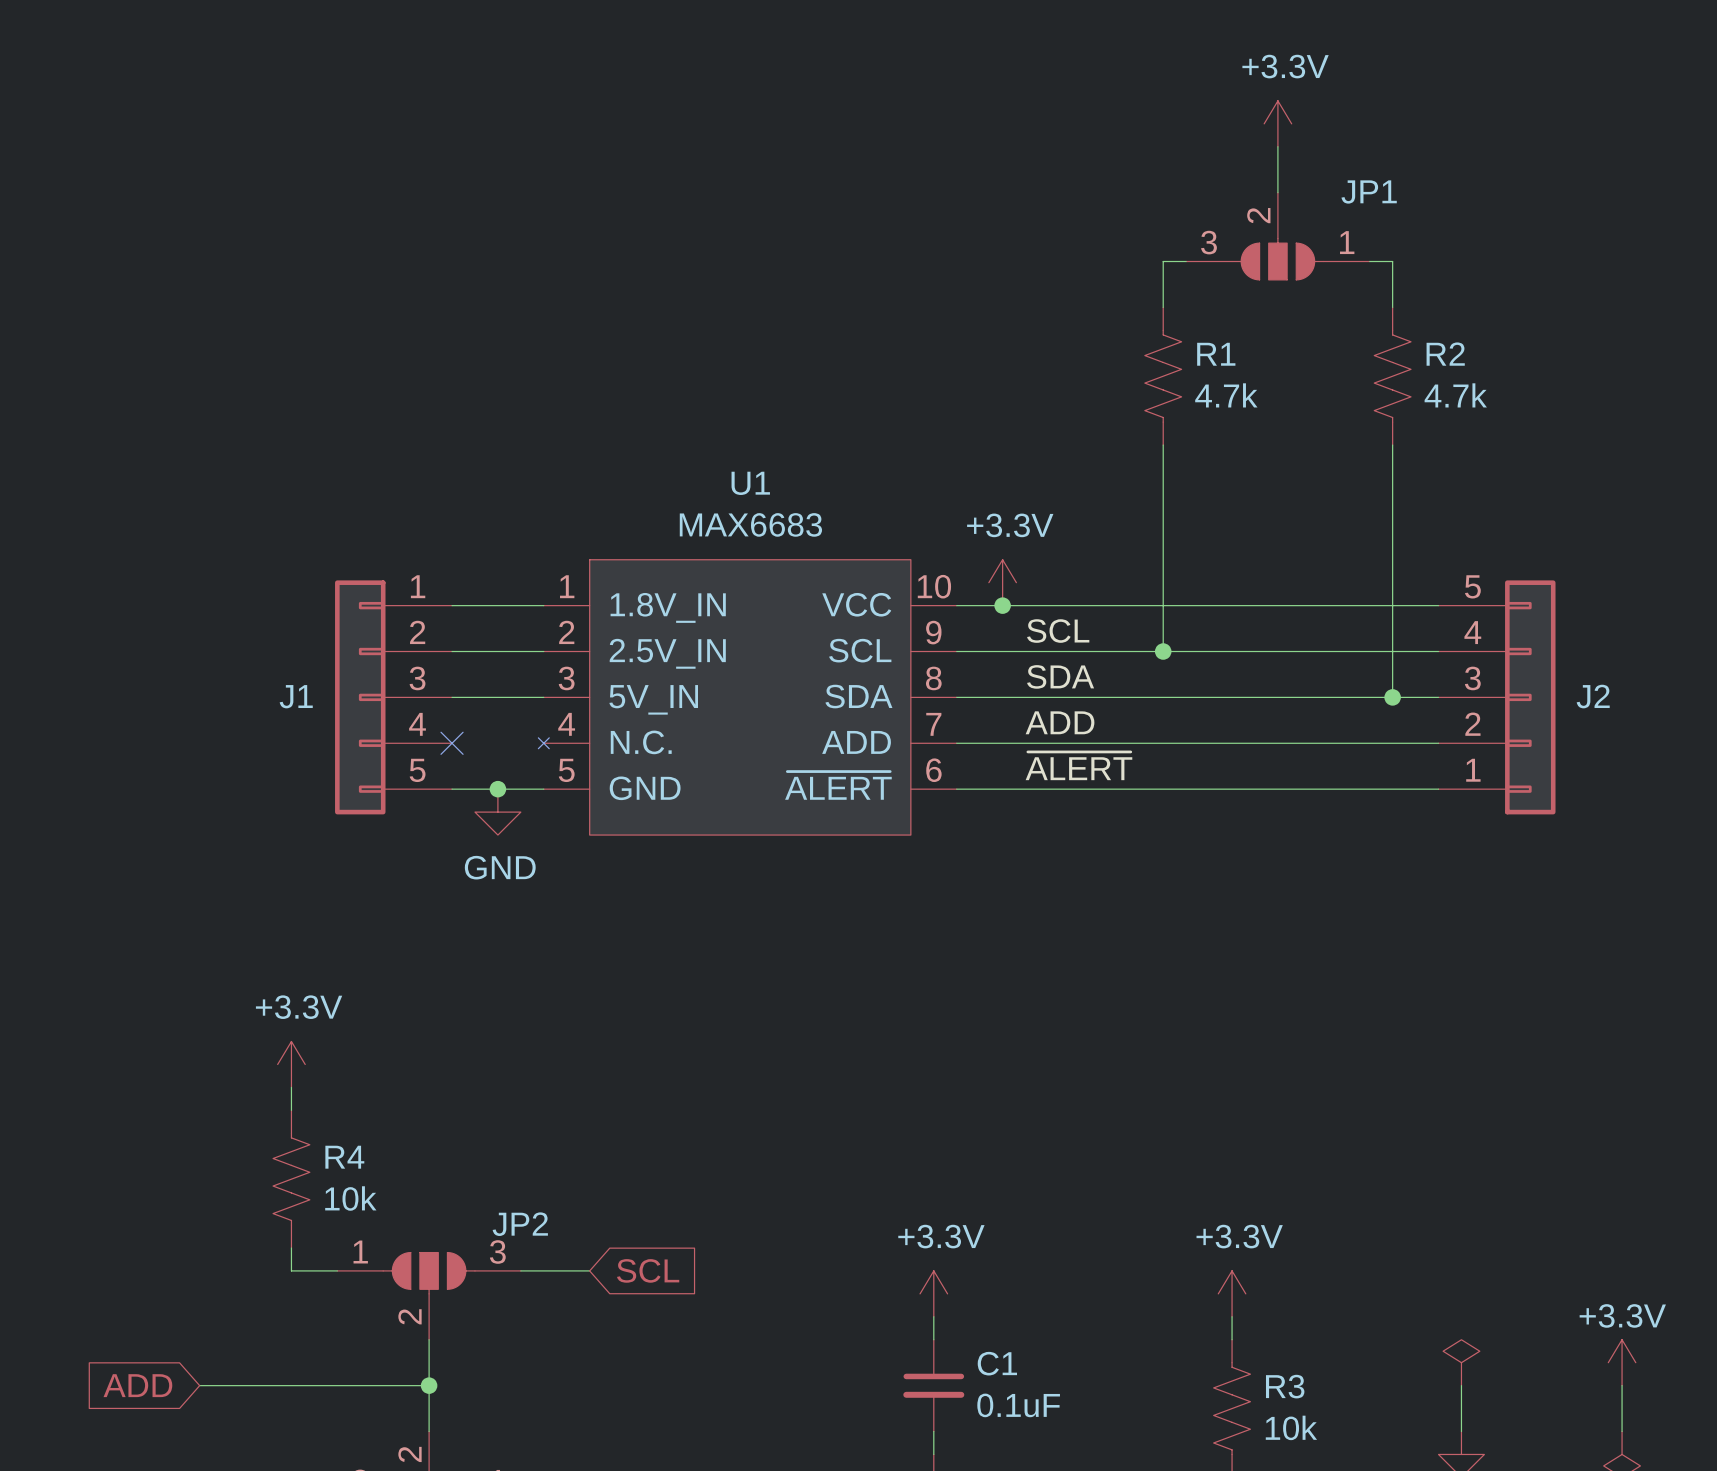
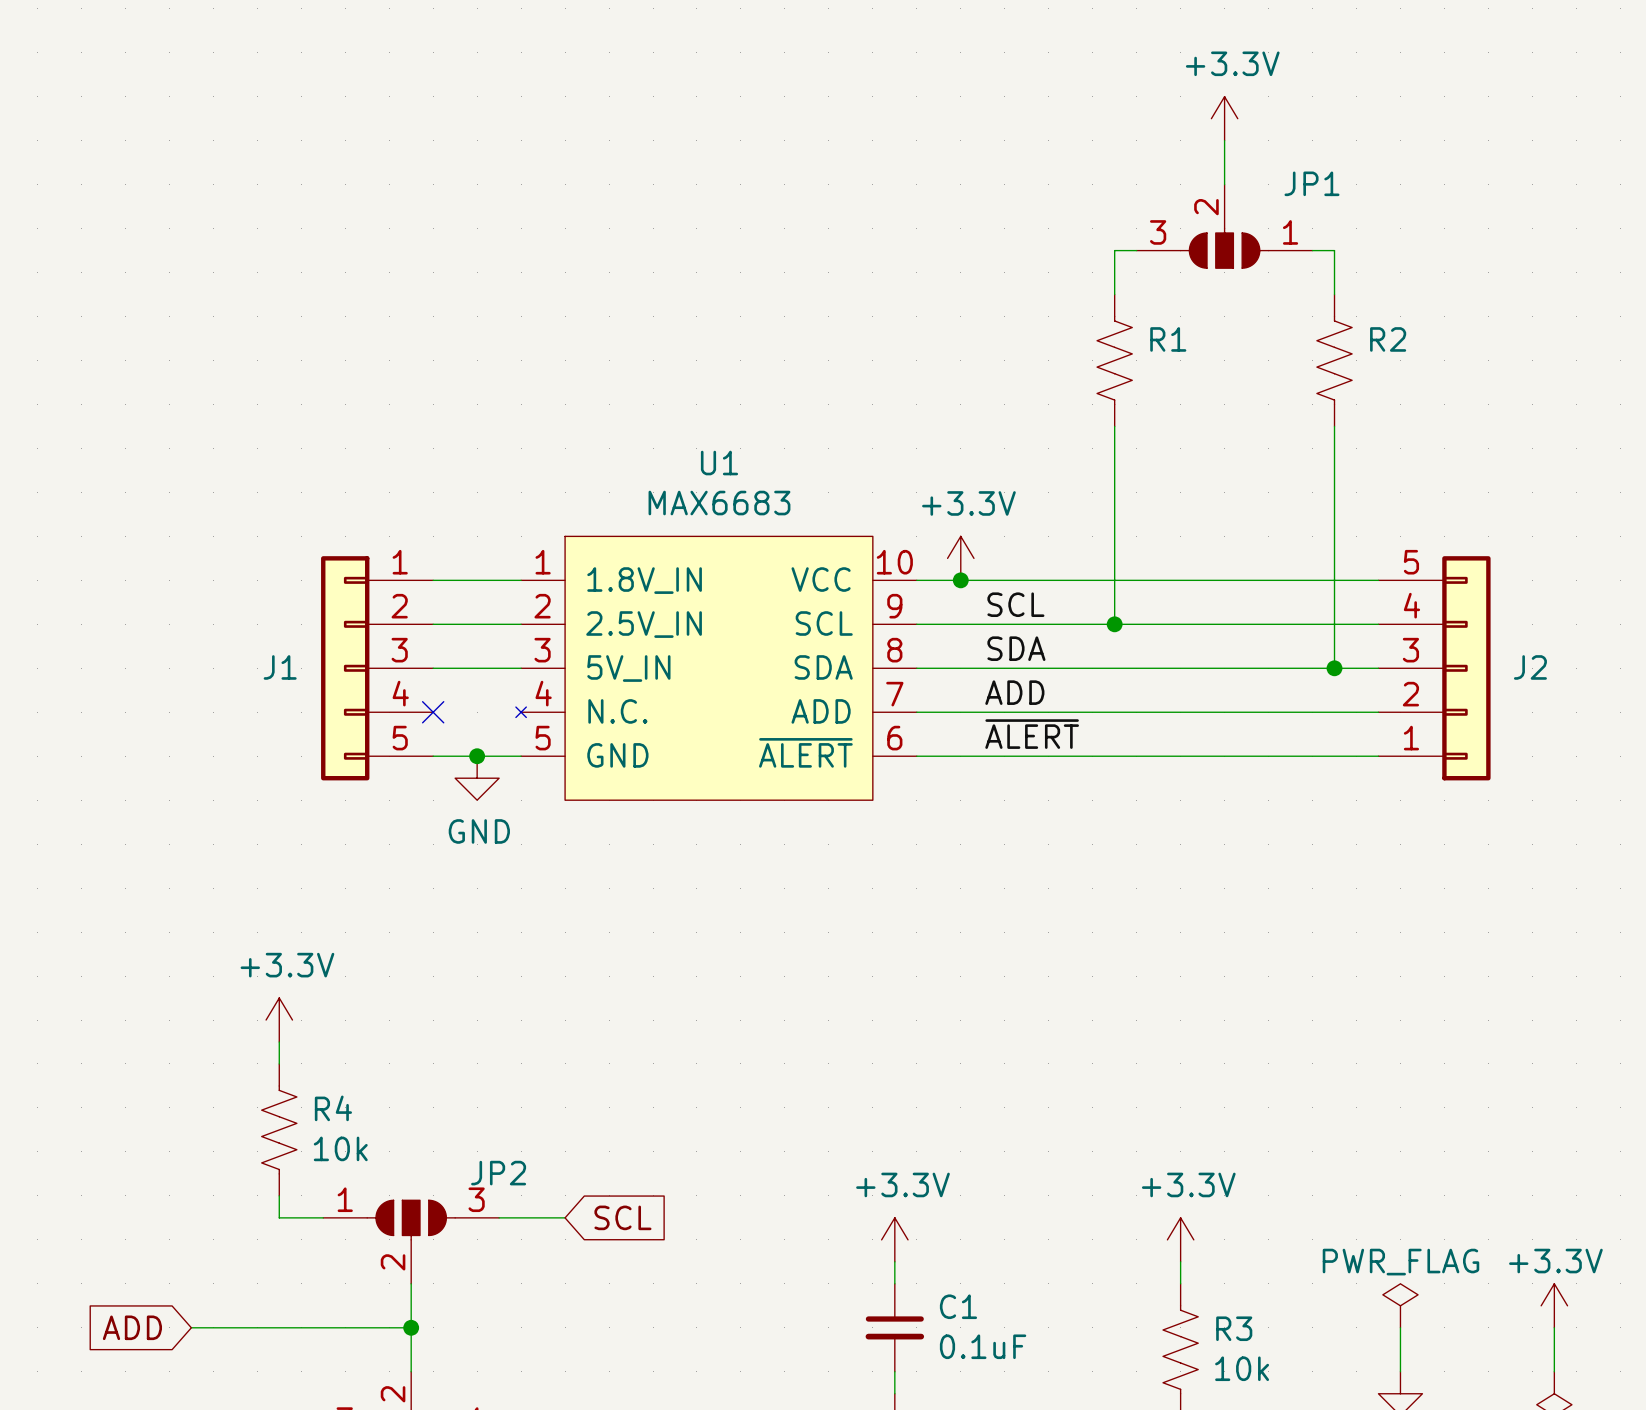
R1 value: 4.7k (1226, 395) -> none
R2 value: 4.7k (1455, 395) -> none
power symbol text: none -> PWR_FLAG (1400, 1262)

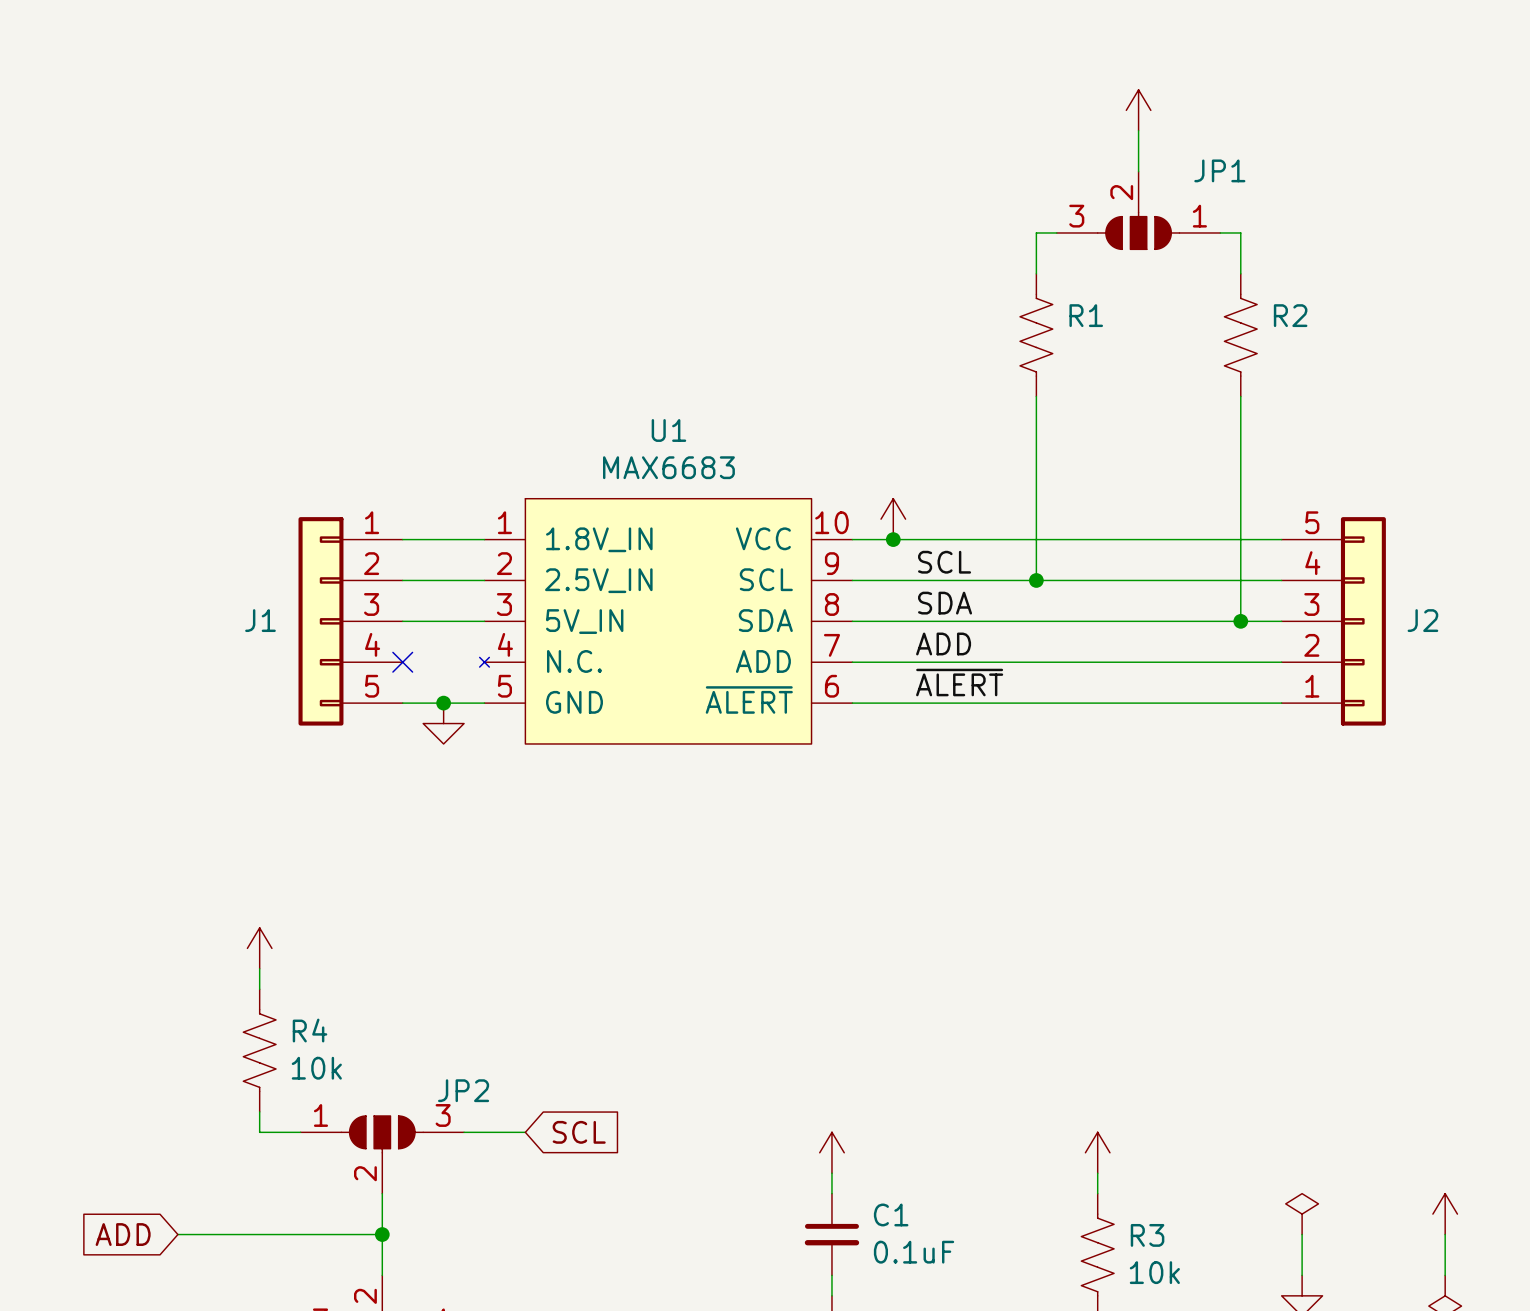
power symbol text: +3.3V (1232, 63) -> none
power symbol text: +3.3V (968, 503) -> none
power symbol text: GND (479, 831) -> none
power symbol text: +3.3V (287, 965) -> none
power symbol text: +3.3V (902, 1184) -> none
power symbol text: +3.3V (1188, 1184) -> none
power symbol text: +3.3V (1555, 1261) -> none
power symbol text: PWR_FLAG (1400, 1262) -> none

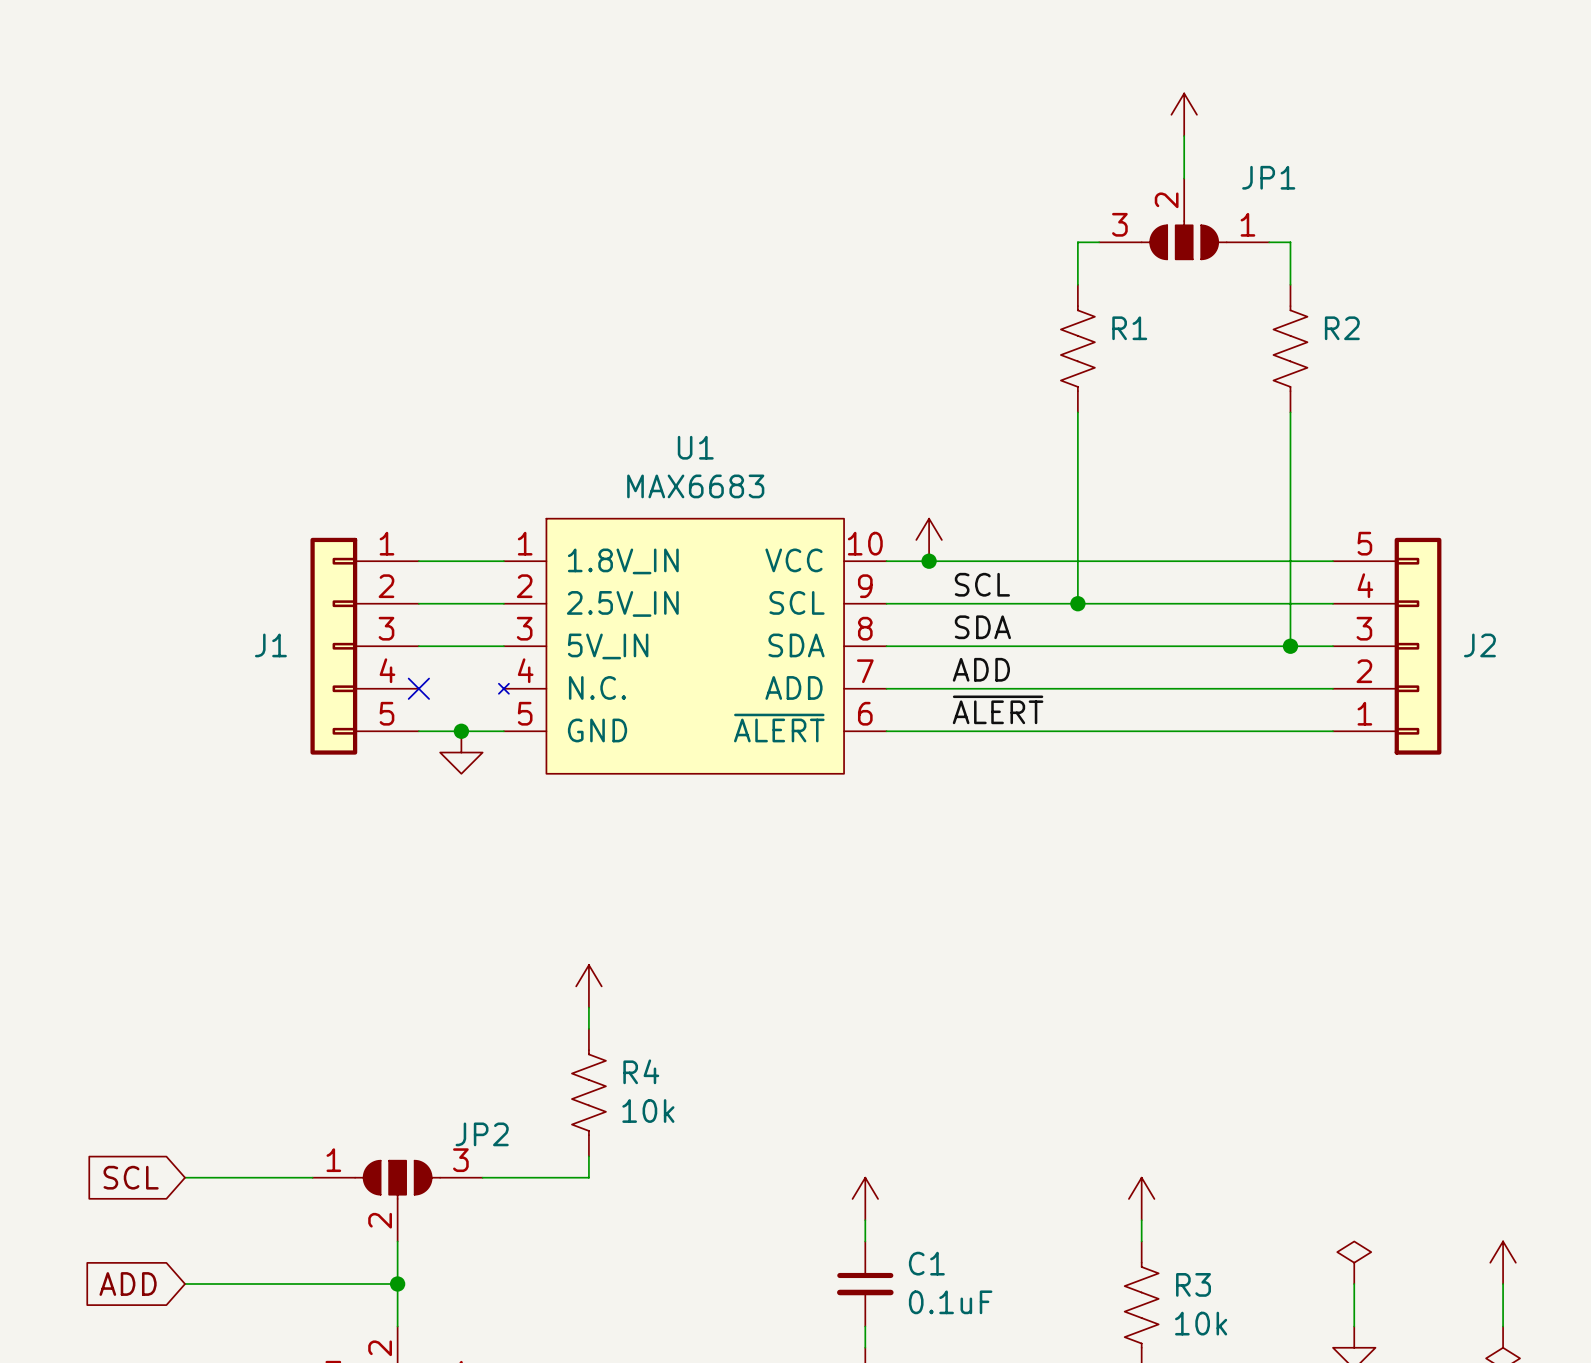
power symbol position: (259, 948) -> (588, 986)
wire: (259, 968) (259, 989) -> (588, 1007) (588, 1028)
R4 position: (259, 1050) -> (588, 1092)
wire: (259, 1111) (259, 1132) -> (185, 1177) (270, 1177)
wire: none -> (588, 1156) (588, 1177) (546, 1177)
global label rotation: 0° (579, 1132) -> 180° (131, 1177)
global label position: SCL (579, 1132) -> SCL (131, 1177)

